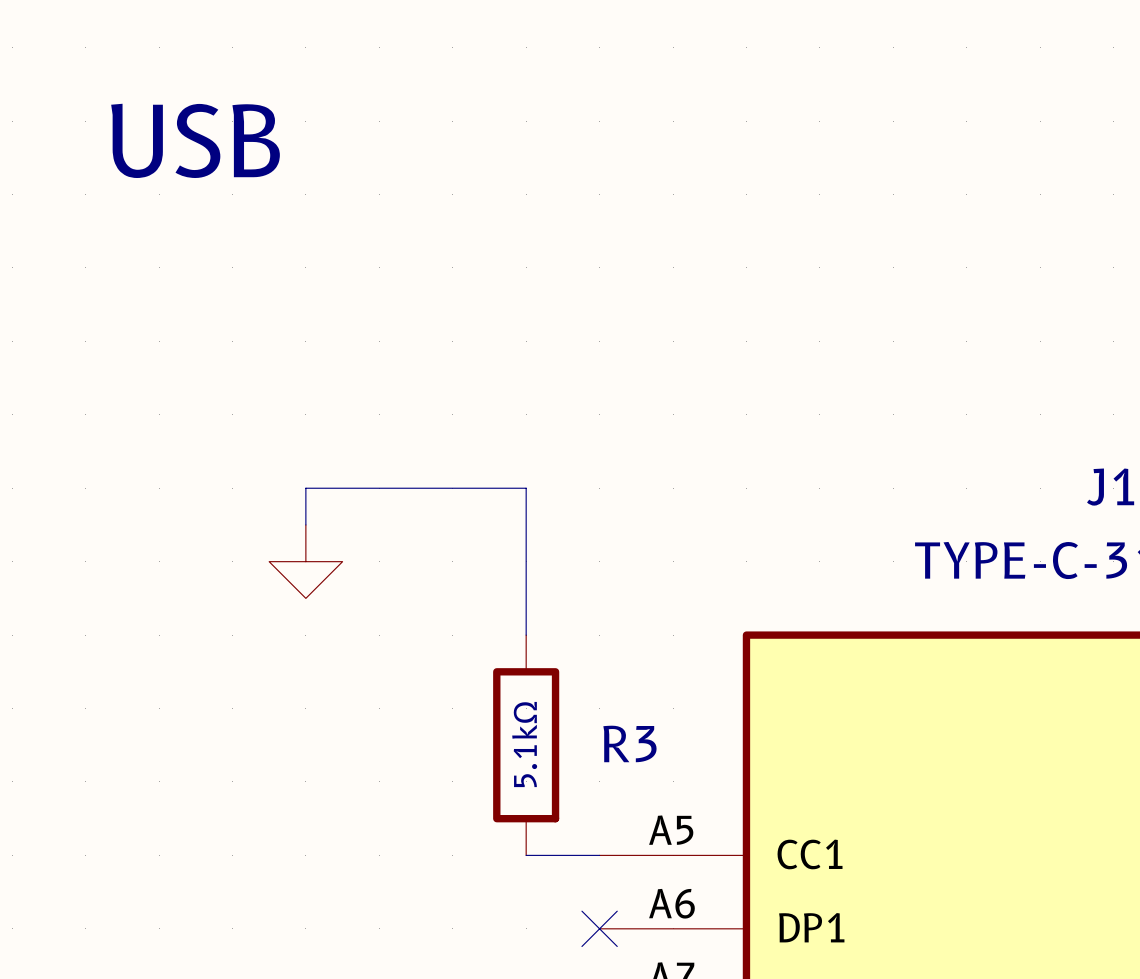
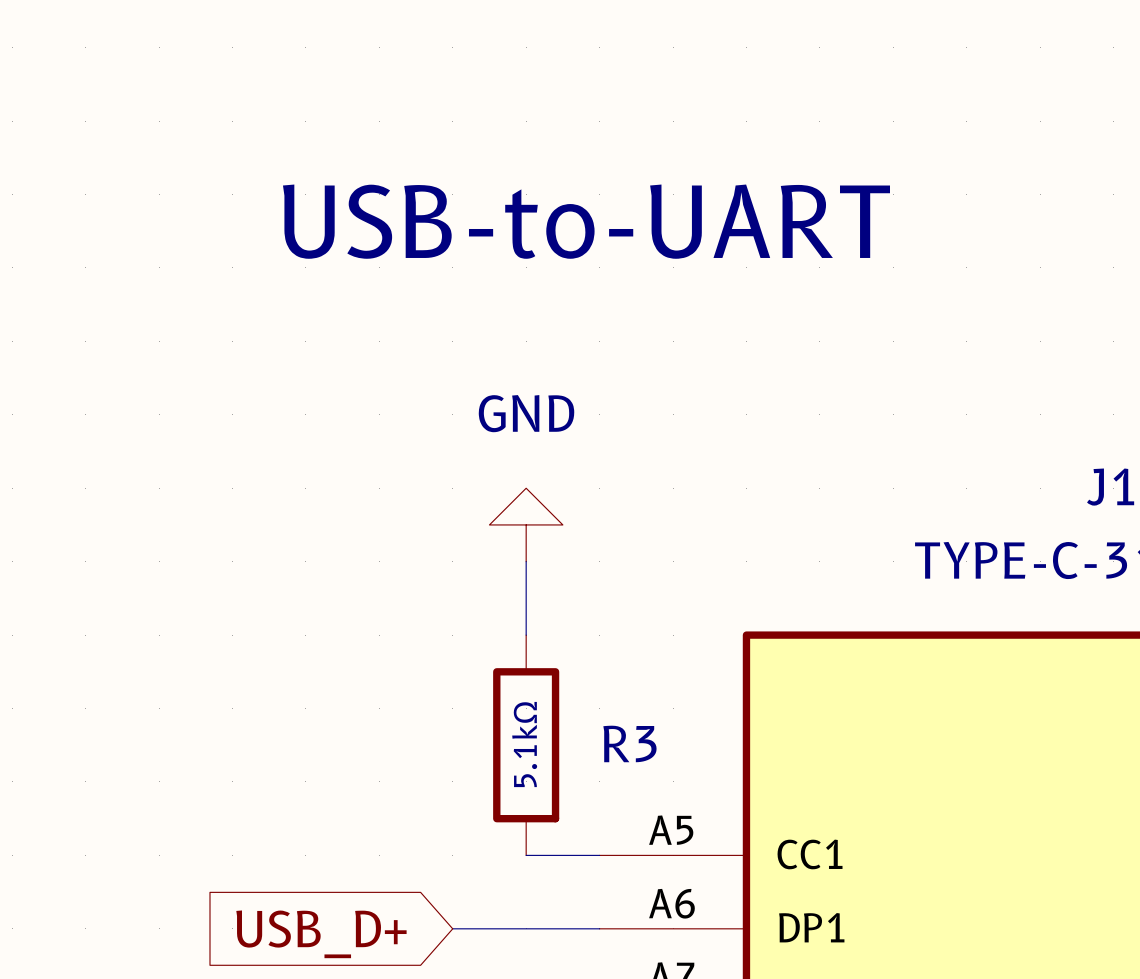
text: USB (195, 140) -> none
text: none -> USB-to-UART (586, 221)
wire: (305, 524) (305, 488) (526, 488) (526, 561) -> none
power symbol: none -> GND (526, 524)
power symbol: (305, 561) -> none
wire: none -> (452, 928) (599, 928)
no-connect mark: (599, 928) -> none
global label: none -> USB_D+ (321, 934)

